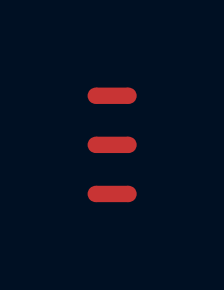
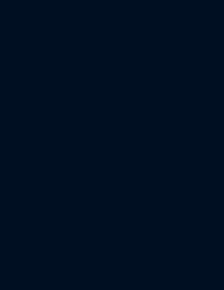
part: (112, 95) -> none
part: (112, 144) -> none
part: (112, 193) -> none

